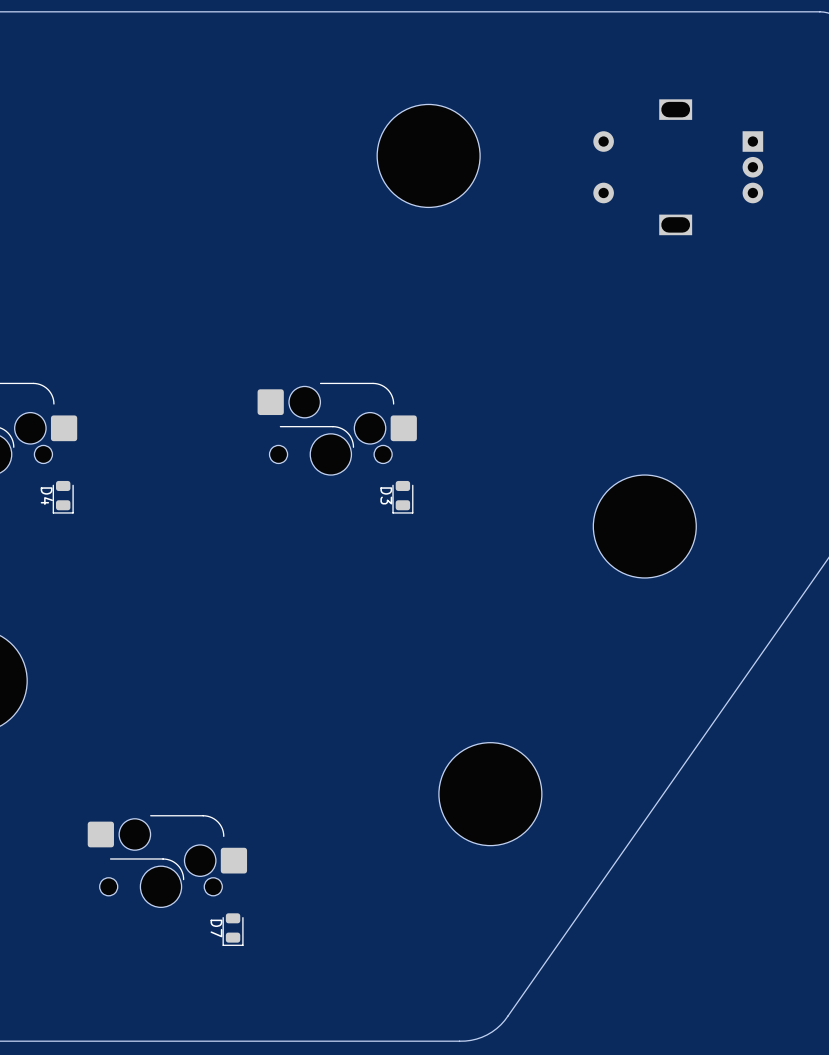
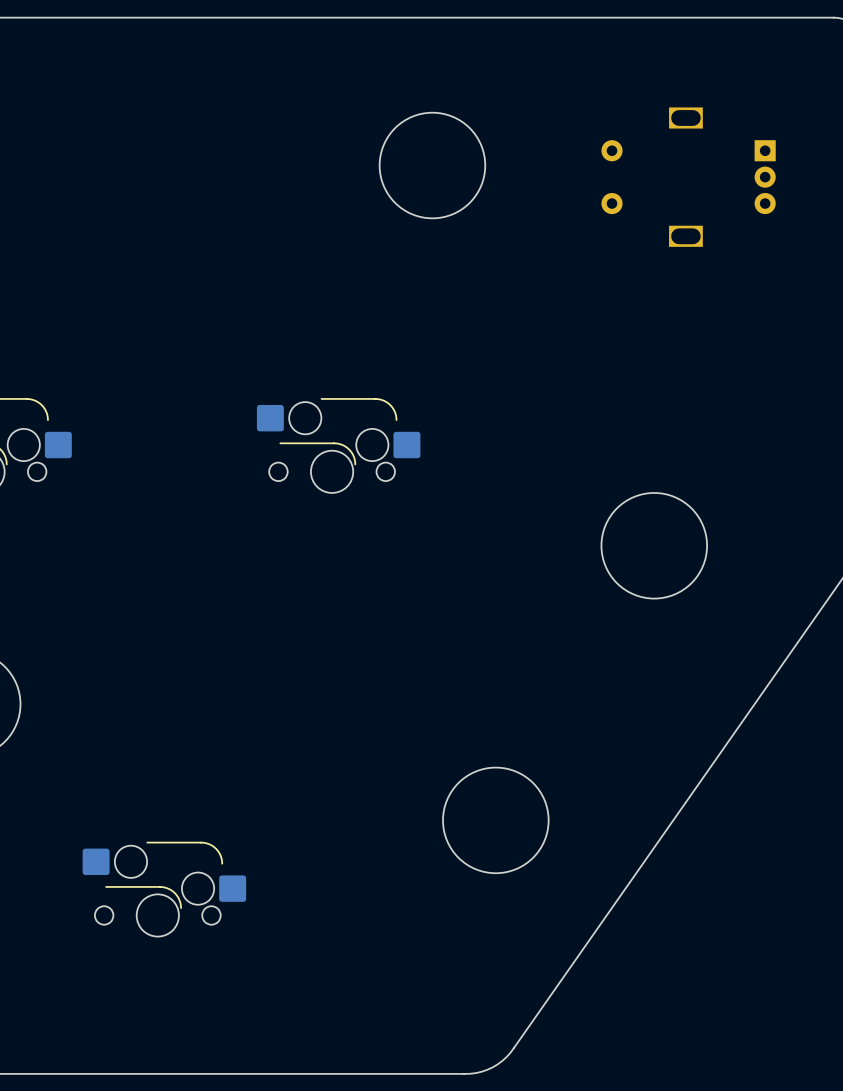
D4: (63, 497) -> none
D3: (402, 497) -> none
D7: (233, 929) -> none

